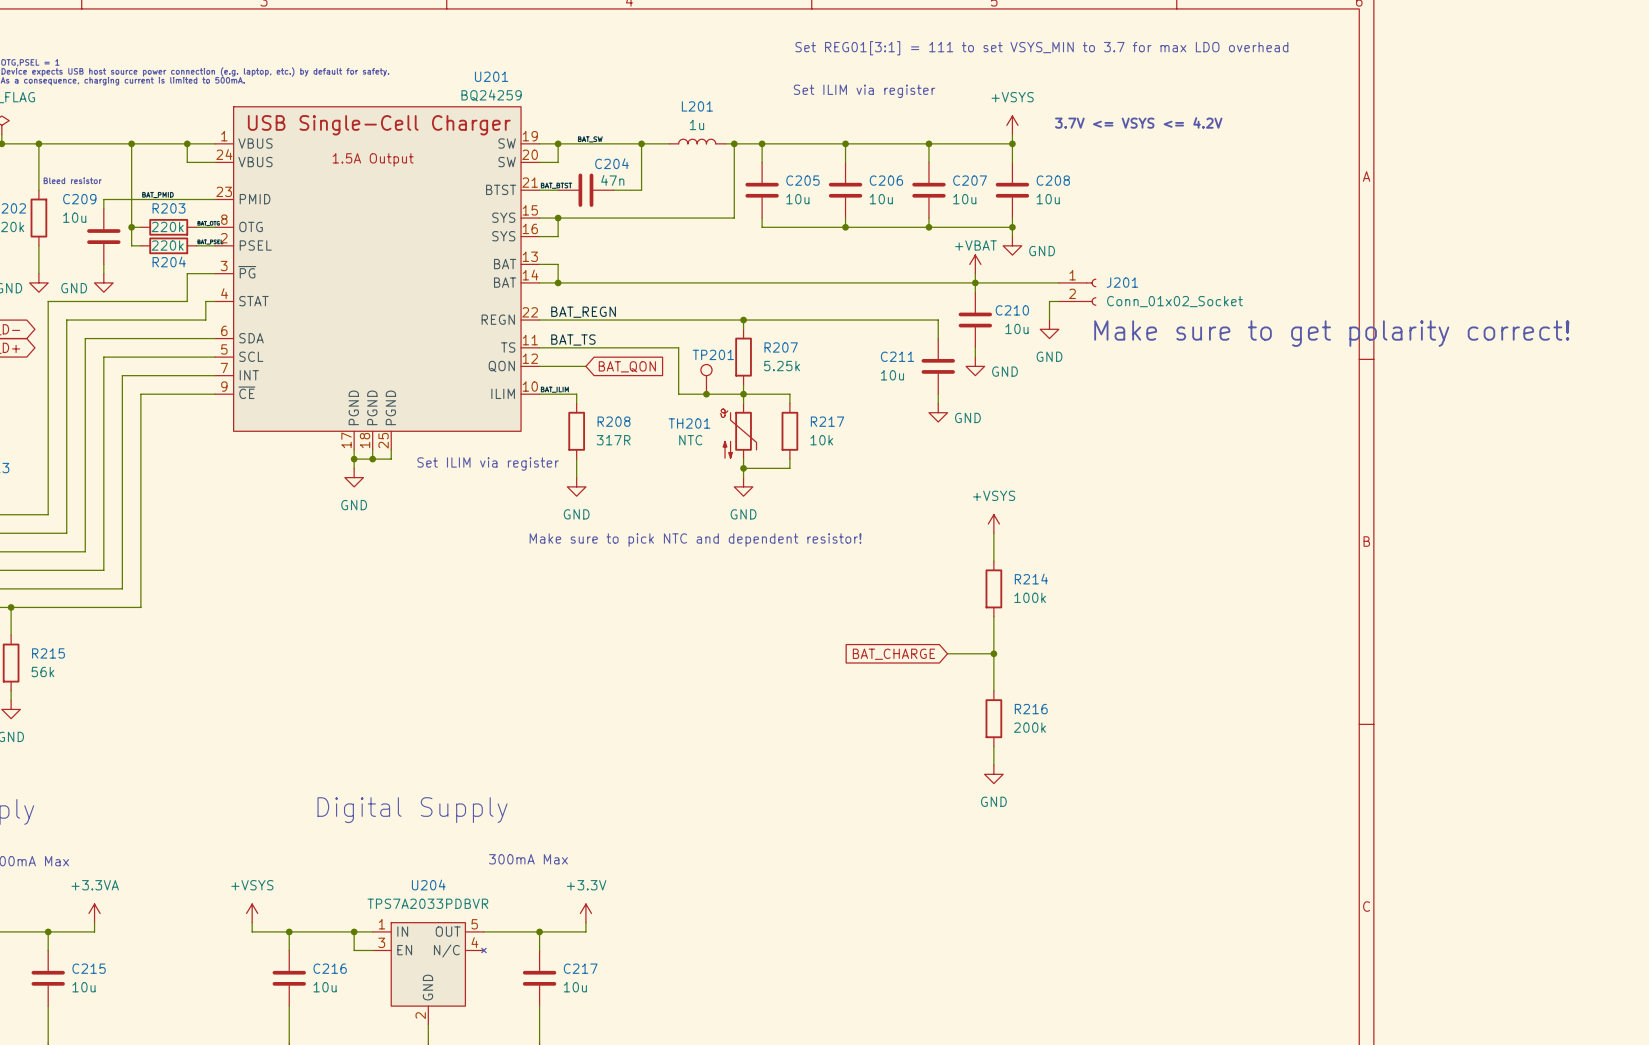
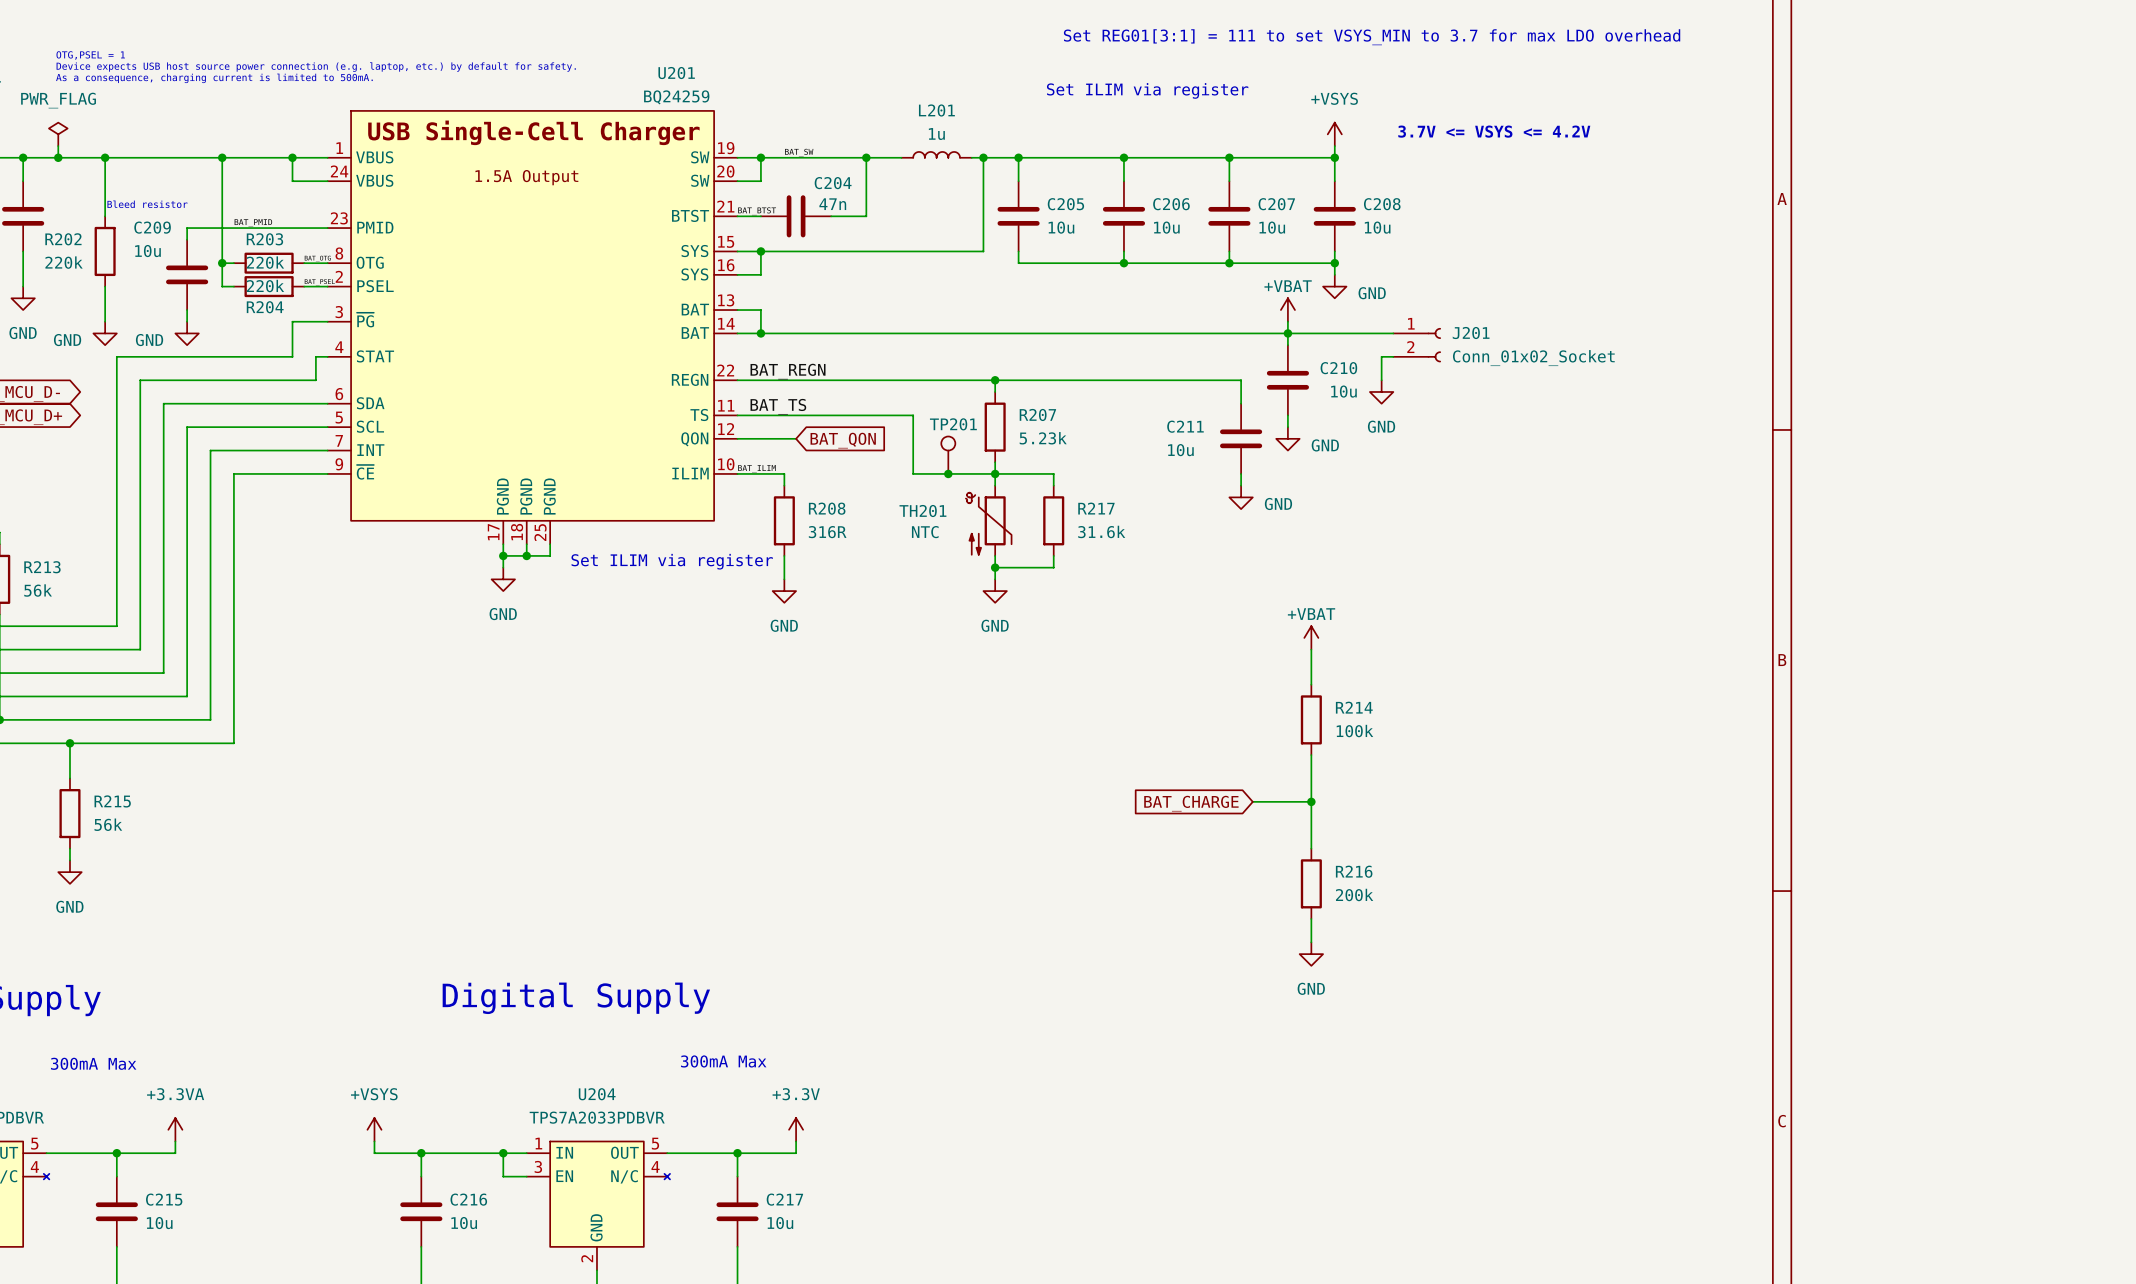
text: Make sure to get polarity correct! (1331, 333) -> none
R207 value: 5.25k (782, 366) -> 5.23k (1043, 438)
R208 value: 317R (613, 440) -> 316R (827, 532)
R217 value: 10k (821, 440) -> 31.6k (1101, 531)
power symbol: +VSYS (993, 523) -> +VBAT (1311, 637)
text: Make sure to pick NTC and dependent resistor! (695, 540) -> none

